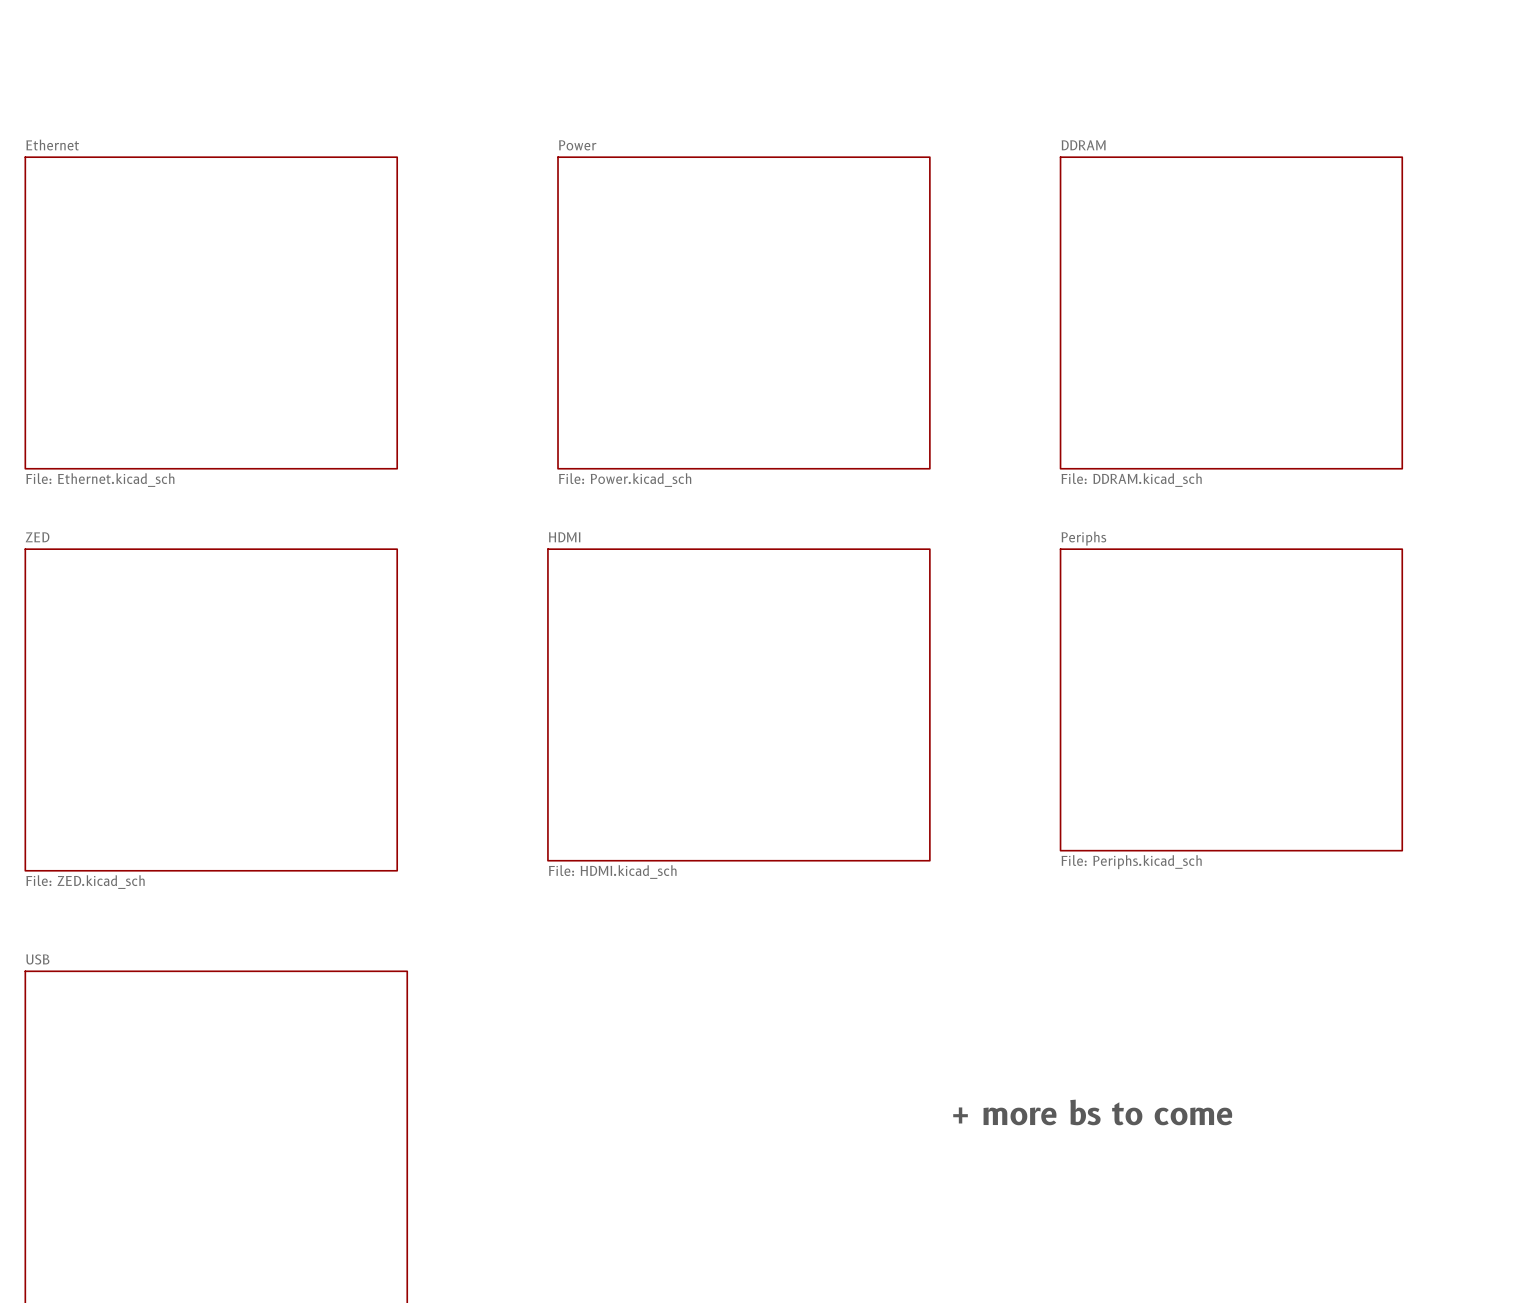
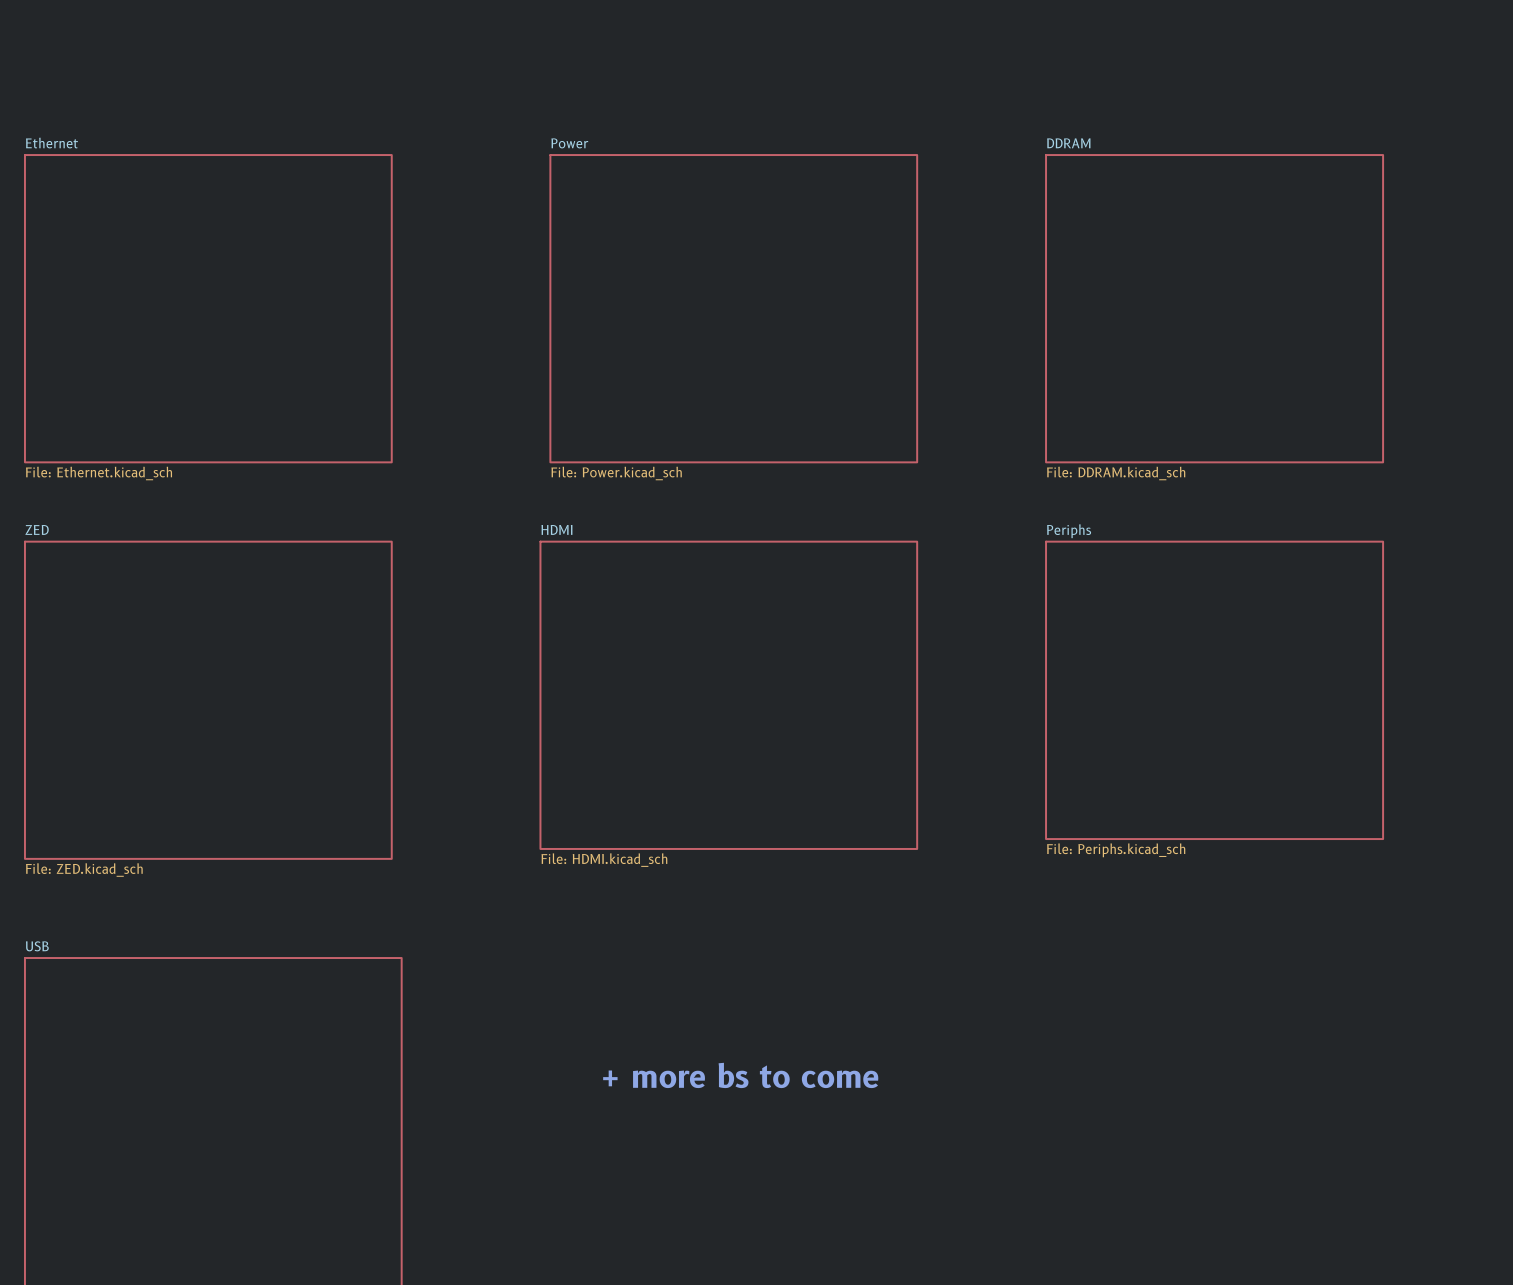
text: none -> + more bs to come (740, 1075)
text: + more bs to come (1092, 1112) -> none

